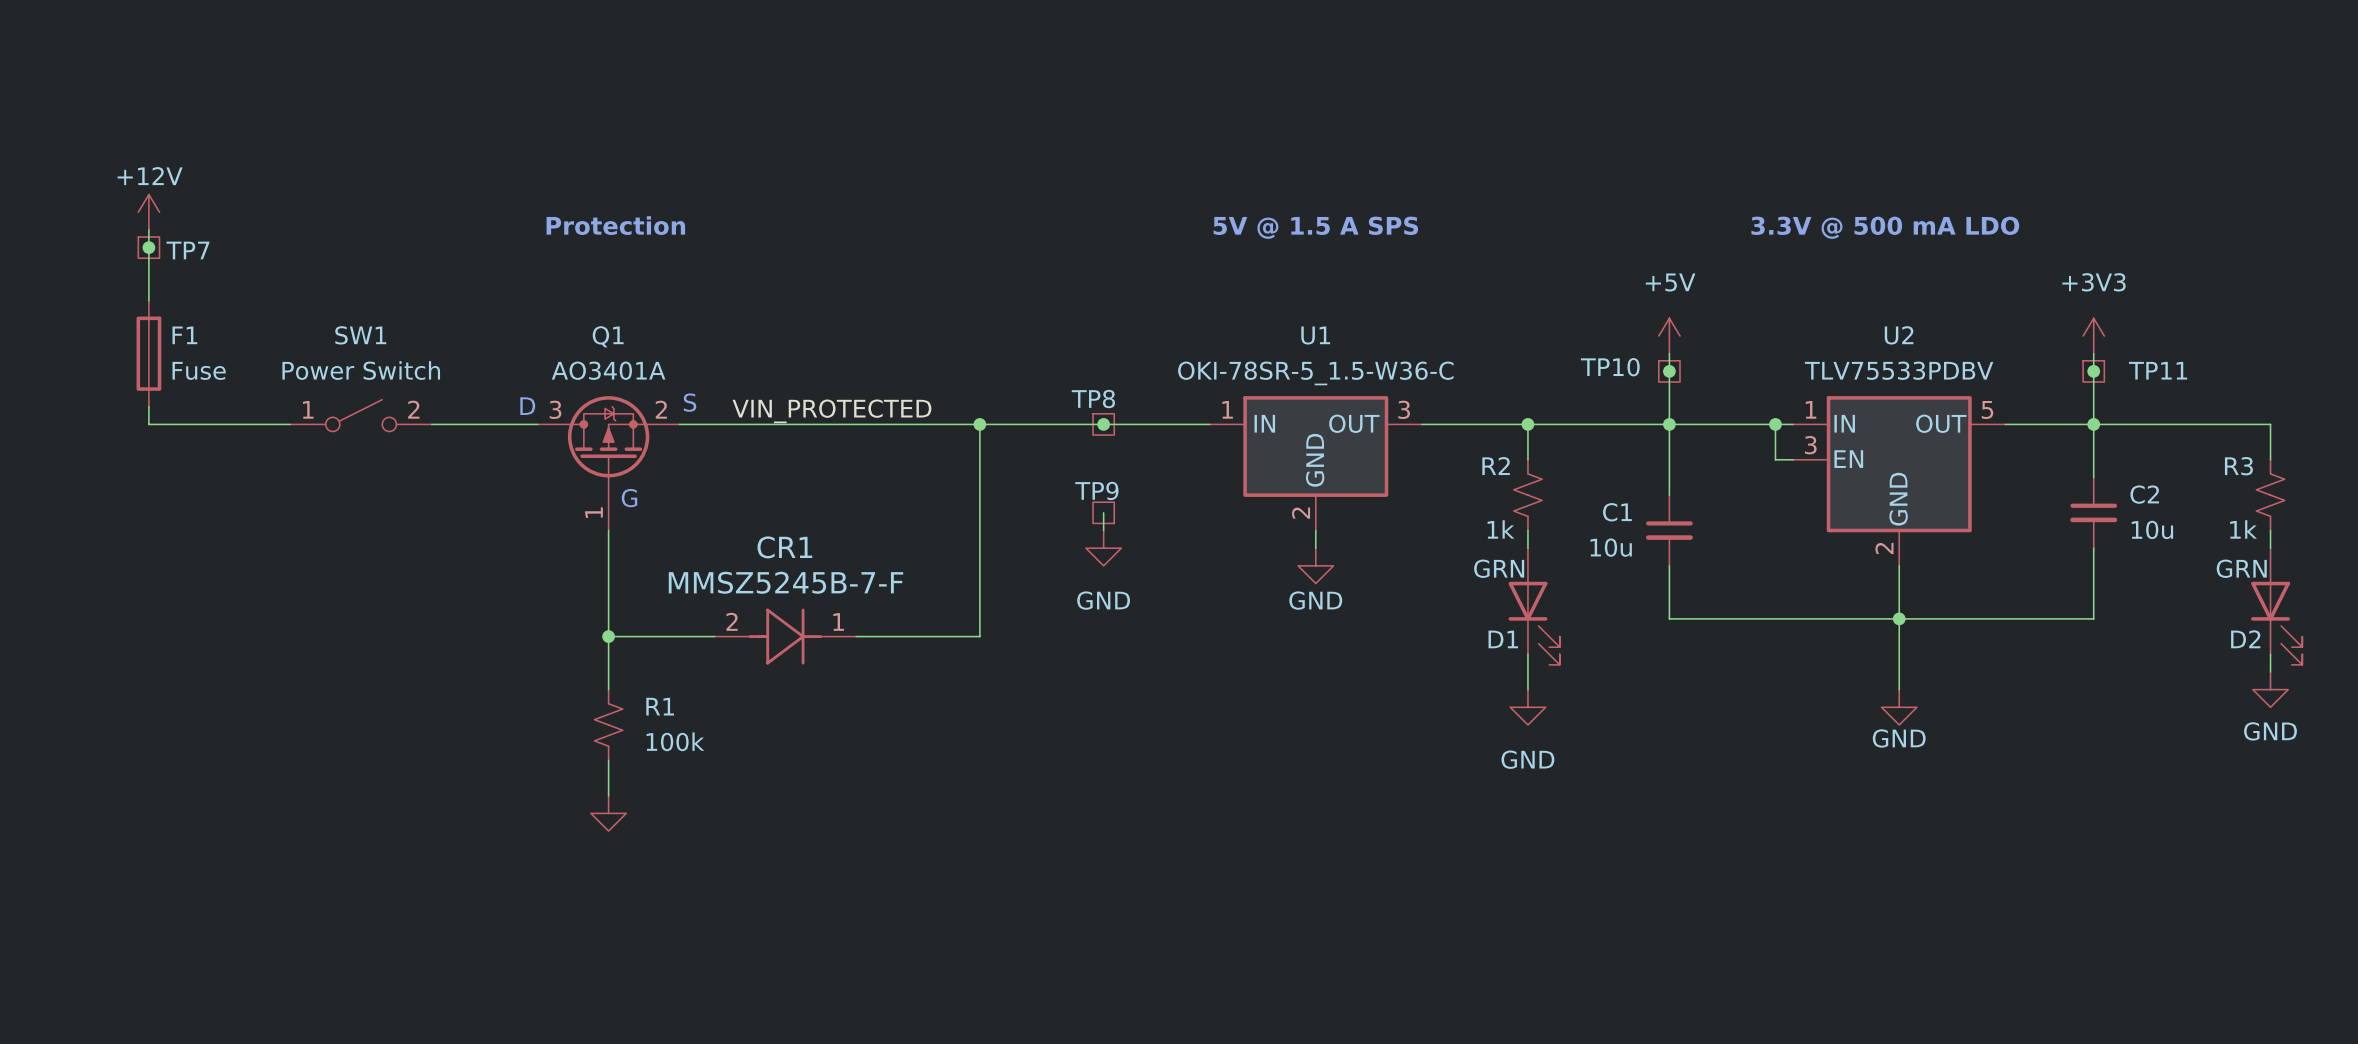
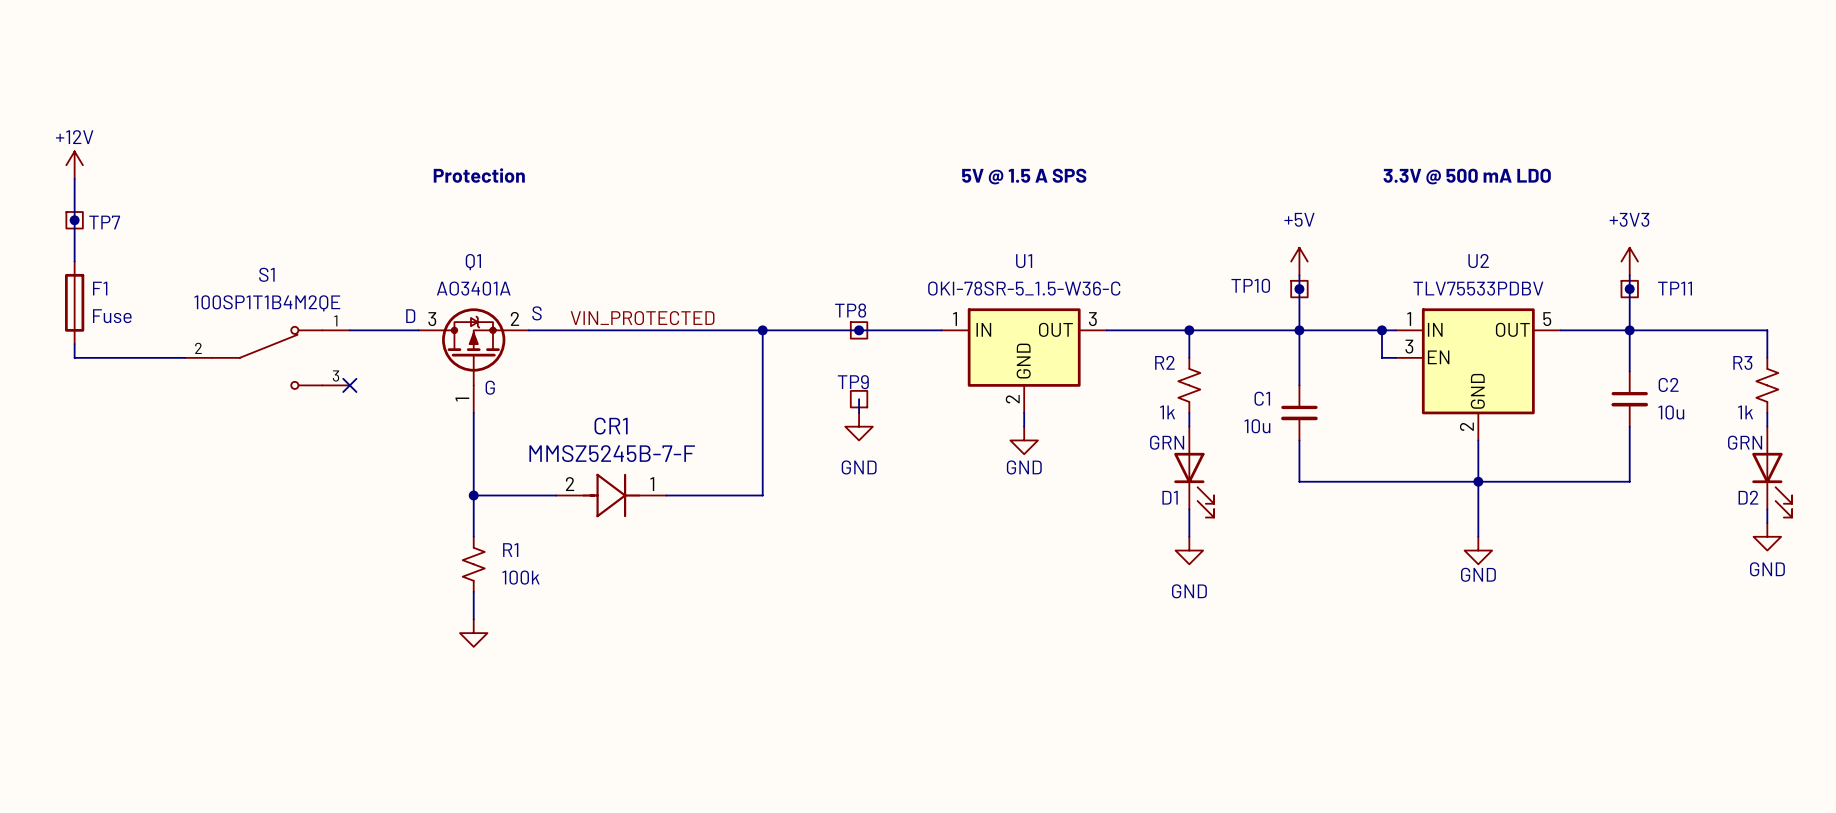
power symbol position: +12V (148, 212) -> +12V (74, 165)
wire: none -> (74, 178) (74, 261)
wire: (148, 229) (148, 300) -> none
junction position: (148, 247) -> (74, 220)
TP7 position: (148, 247) -> (74, 220)
F1 position: (148, 353) -> (74, 302)
wire: (148, 406) (148, 424) (290, 424) -> (74, 344) (74, 357) (184, 357)
SW1: Power Switch (361, 415) -> none
S1: none -> 100SP1T1B4M2QE (267, 357)
no-connect mark: none -> (349, 385)

